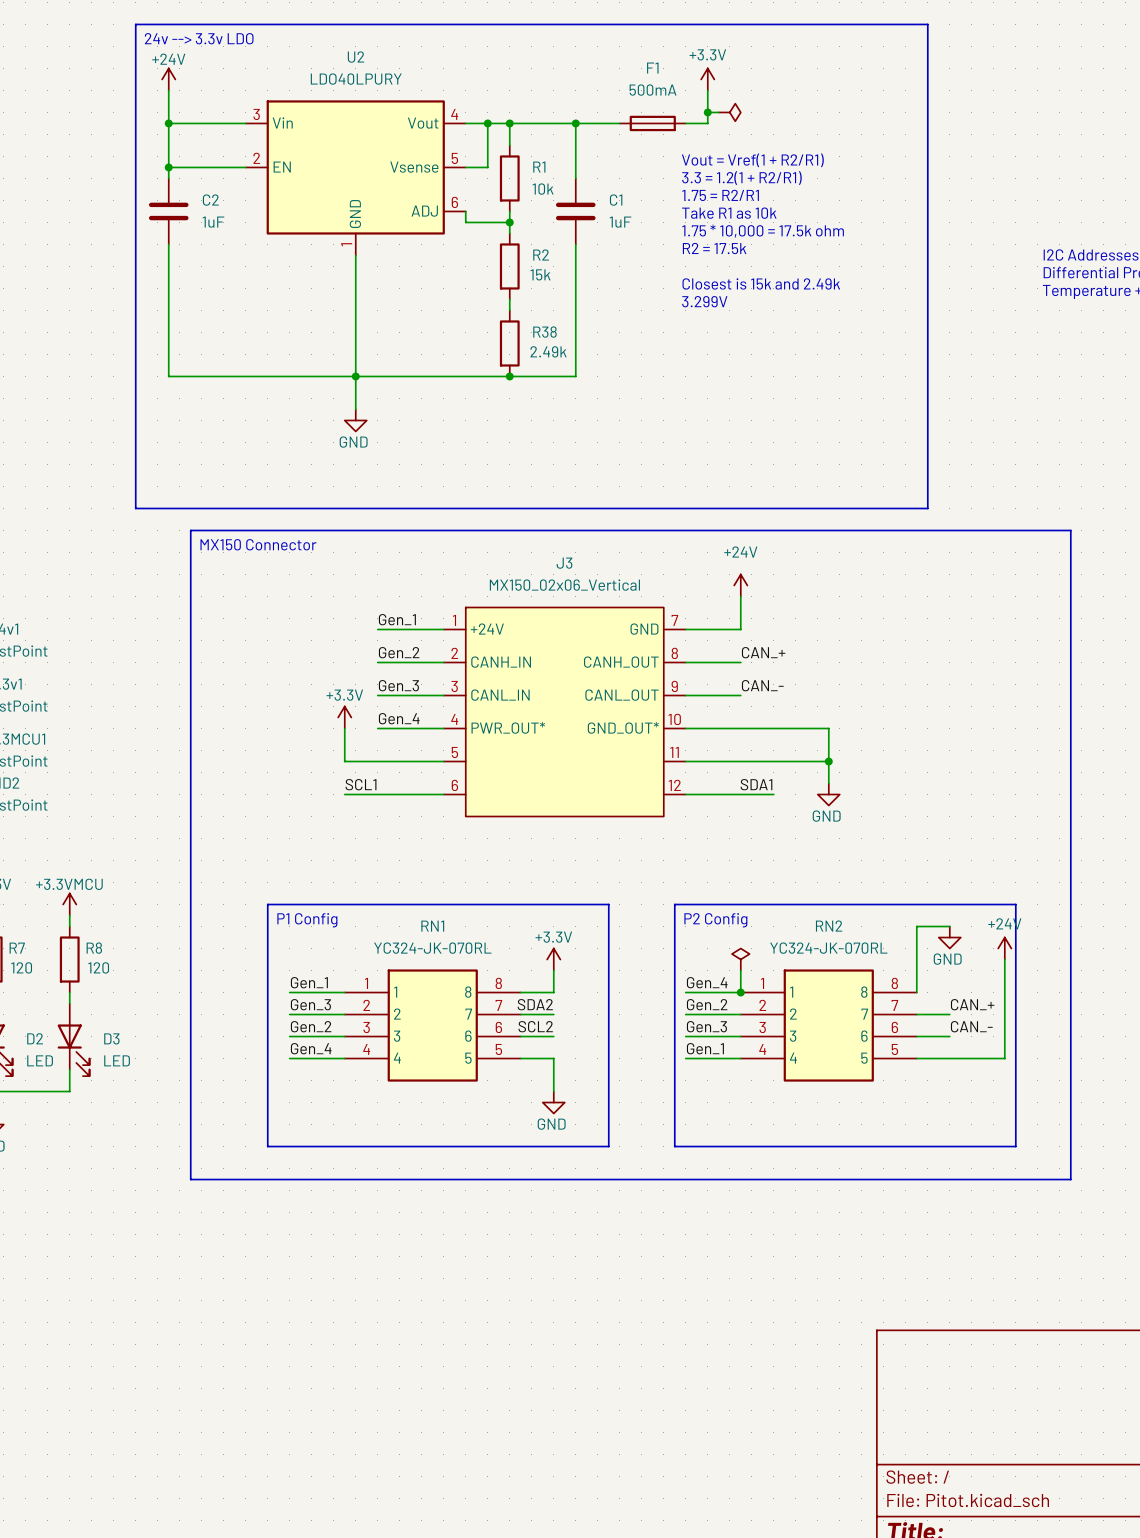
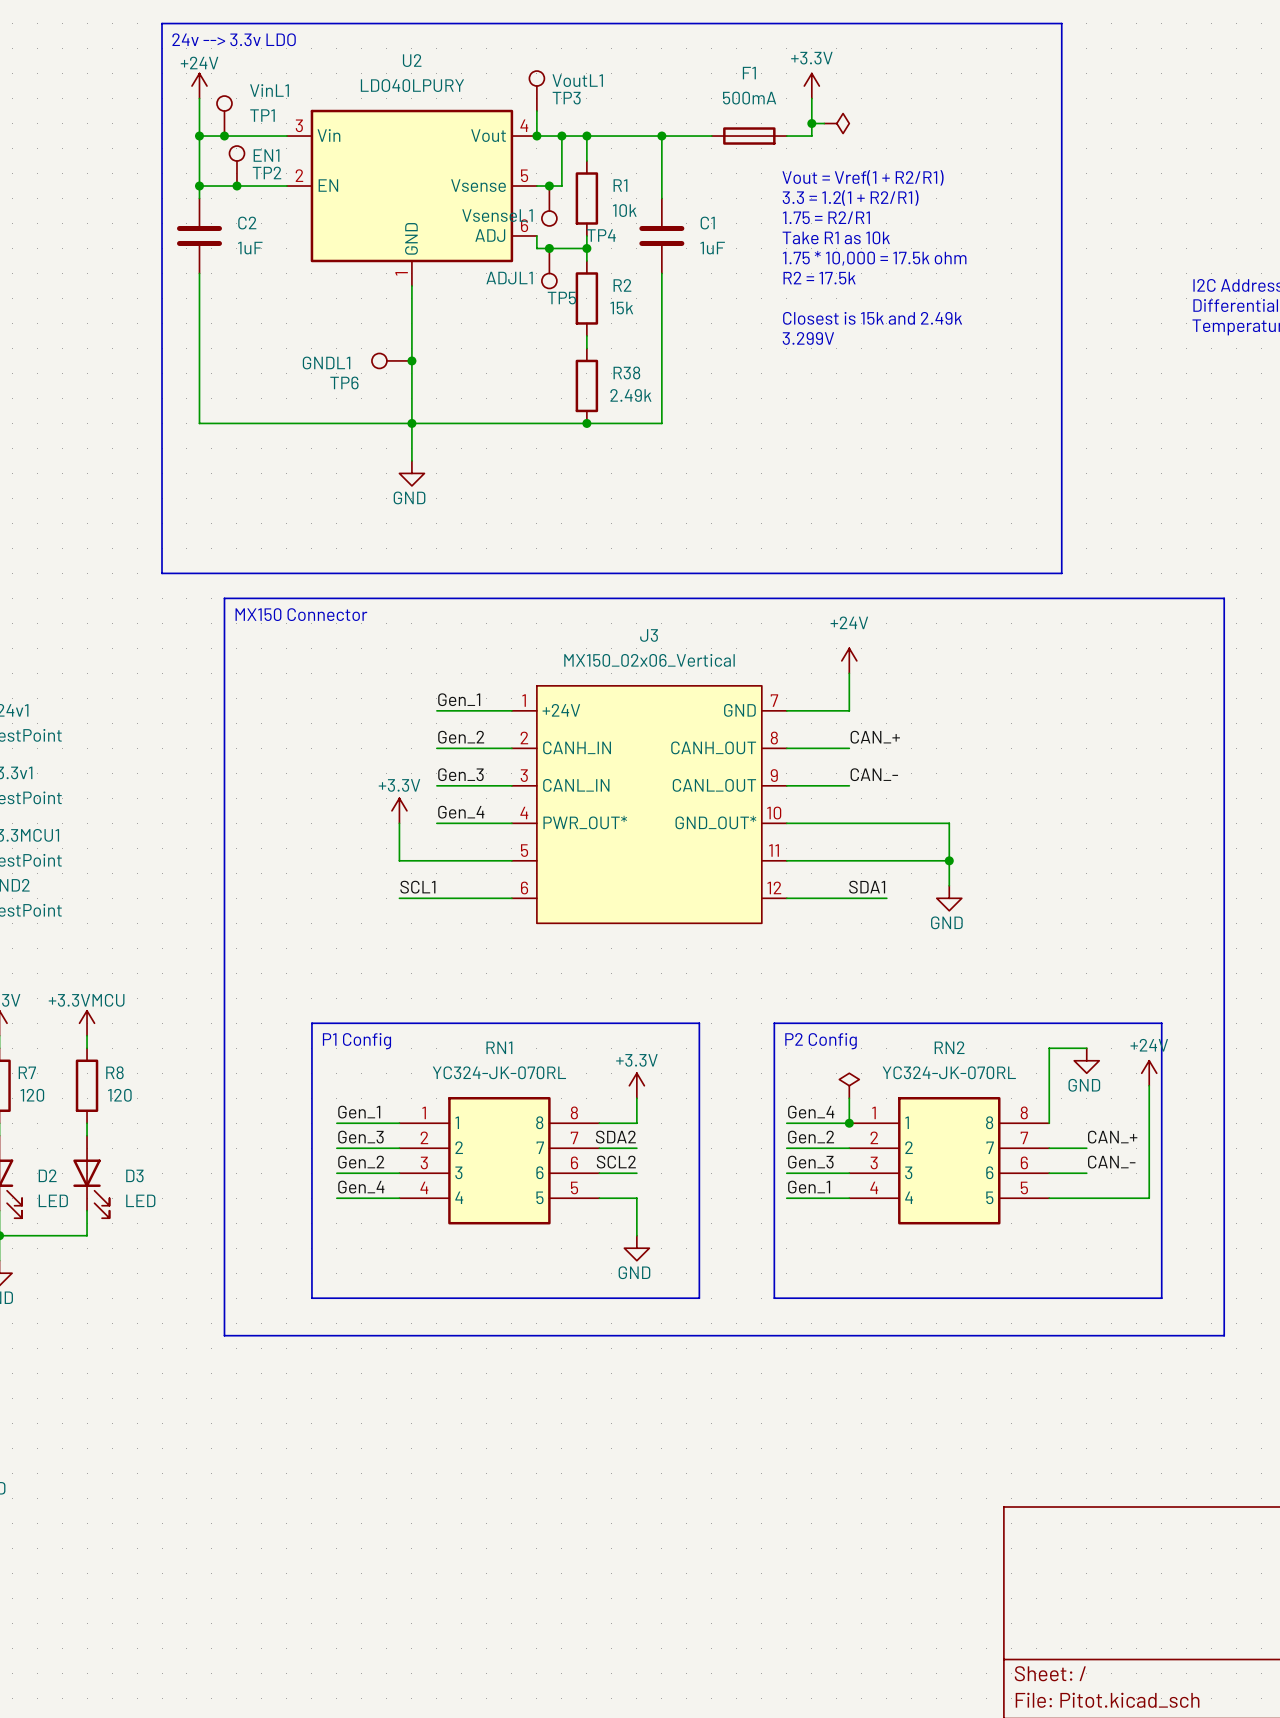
VoutL1: none -> TP3 (536, 91)
wire: none -> (536, 111) (536, 136)
VinL1: none -> TP1 (224, 116)
junction: none -> (224, 136)
junction: none -> (536, 136)
EN1: none -> TP2 (236, 166)
junction: none -> (236, 186)
junction: none -> (549, 186)
VsenseL1: none -> TP4 (549, 205)
junction: none -> (549, 248)
ADJL1: none -> TP5 (549, 268)
GNDL1: none -> TP6 (391, 360)
junction: none -> (411, 360)

